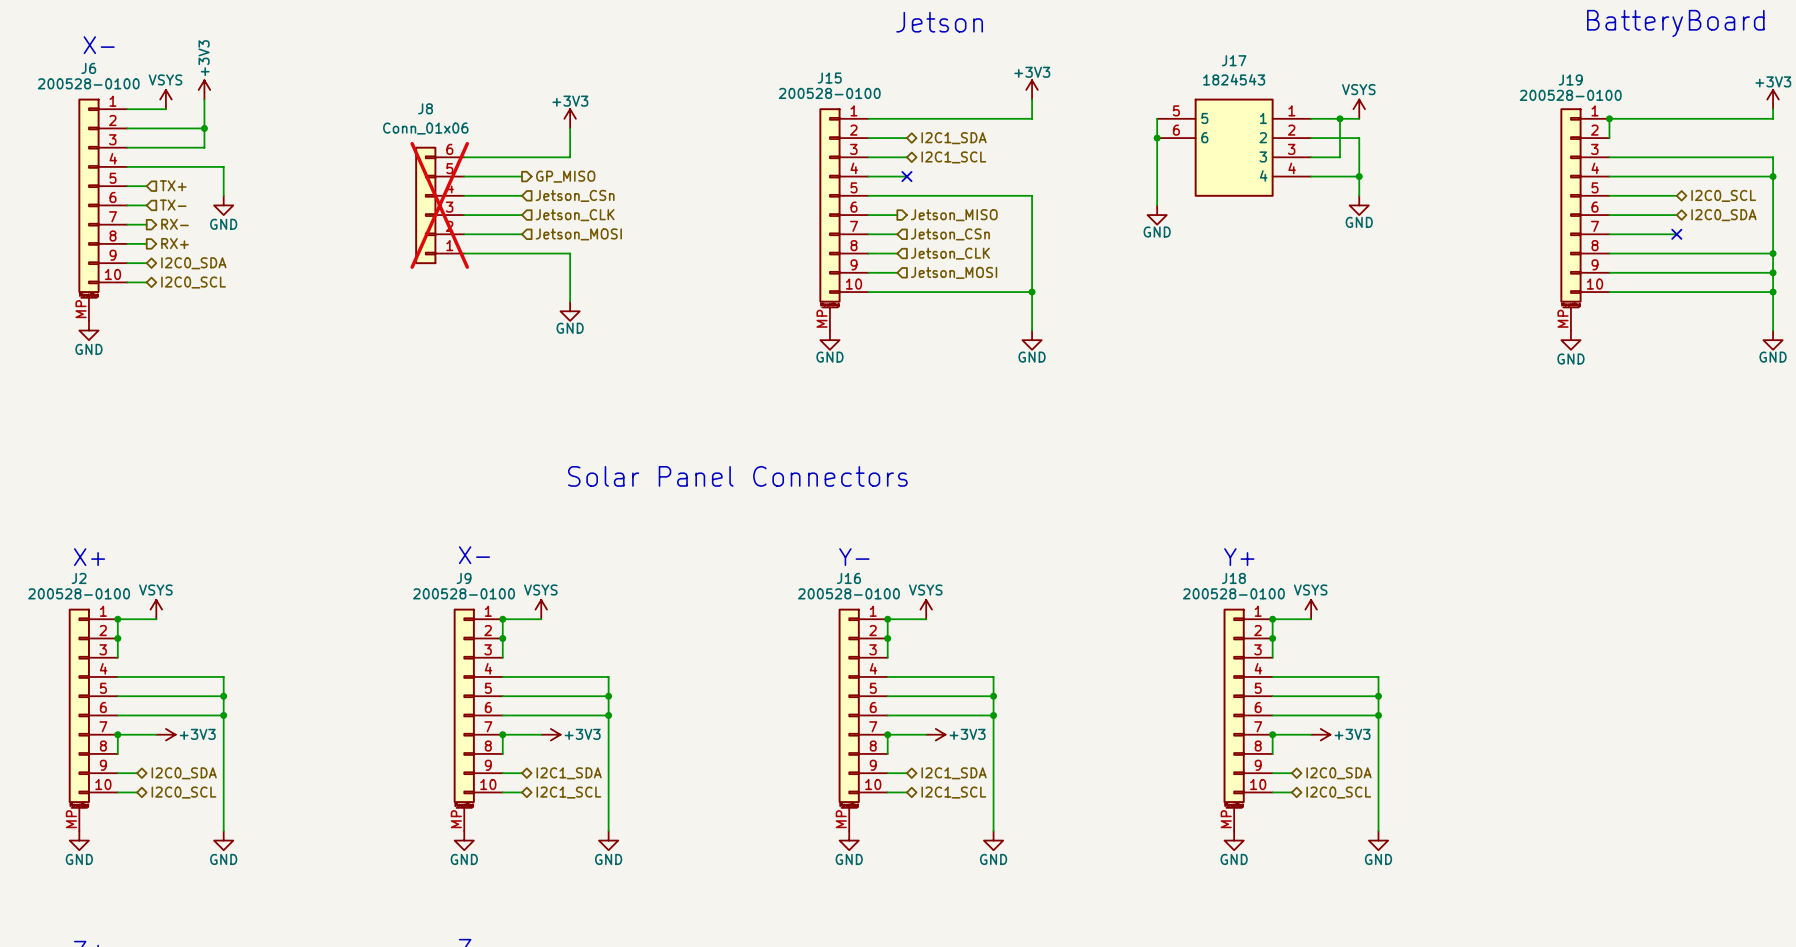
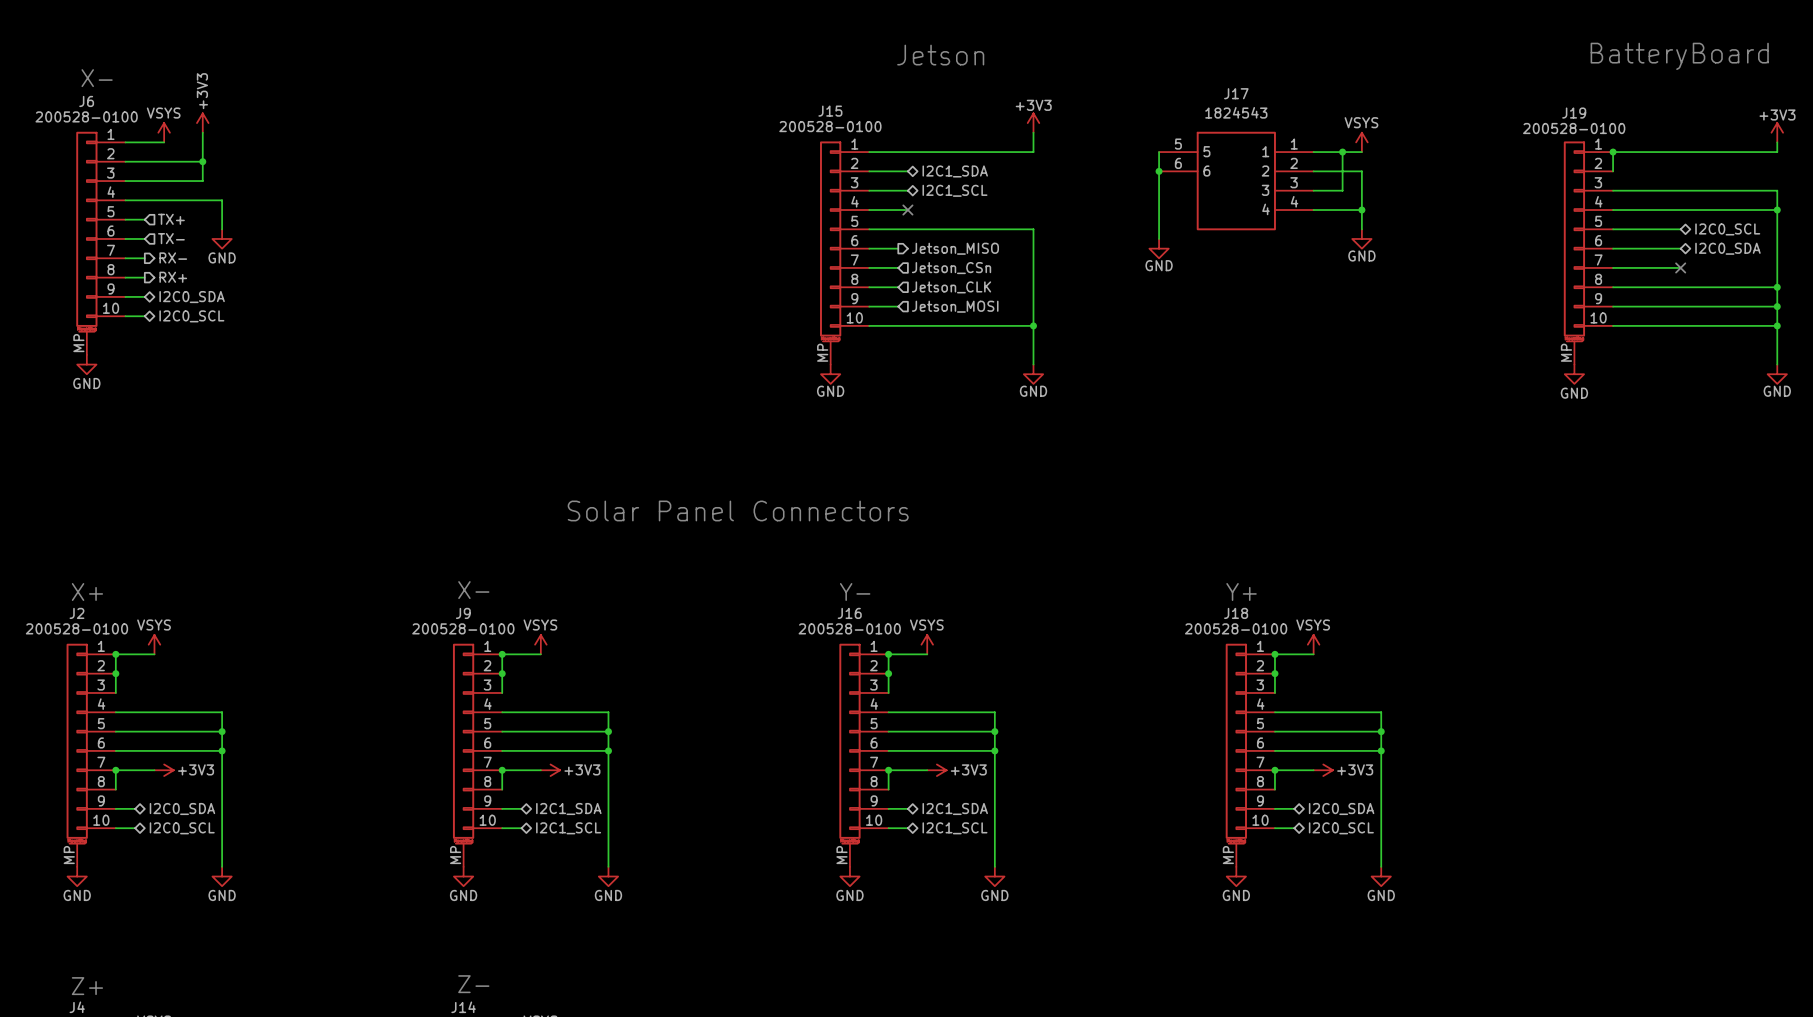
power symbol: +3V3 (570, 118) -> none
wire: (570, 128) (570, 157) (464, 157) -> none
wire: (464, 176) (522, 176) -> none
hierarchical label: GP_MISO (565, 176) -> none
wire: (464, 195) (522, 195) -> none
hierarchical label: Jetson_CSn (575, 195) -> none
J8: Conn_01x06 (439, 205) -> none
wire: (464, 215) (522, 215) -> none
hierarchical label: Jetson_CLK (575, 215) -> none
wire: (464, 234) (522, 234) -> none
hierarchical label: Jetson_MOSI (578, 234) -> none
wire: (464, 253) (570, 253) (570, 301) -> none
power symbol: GND (570, 311) -> none

